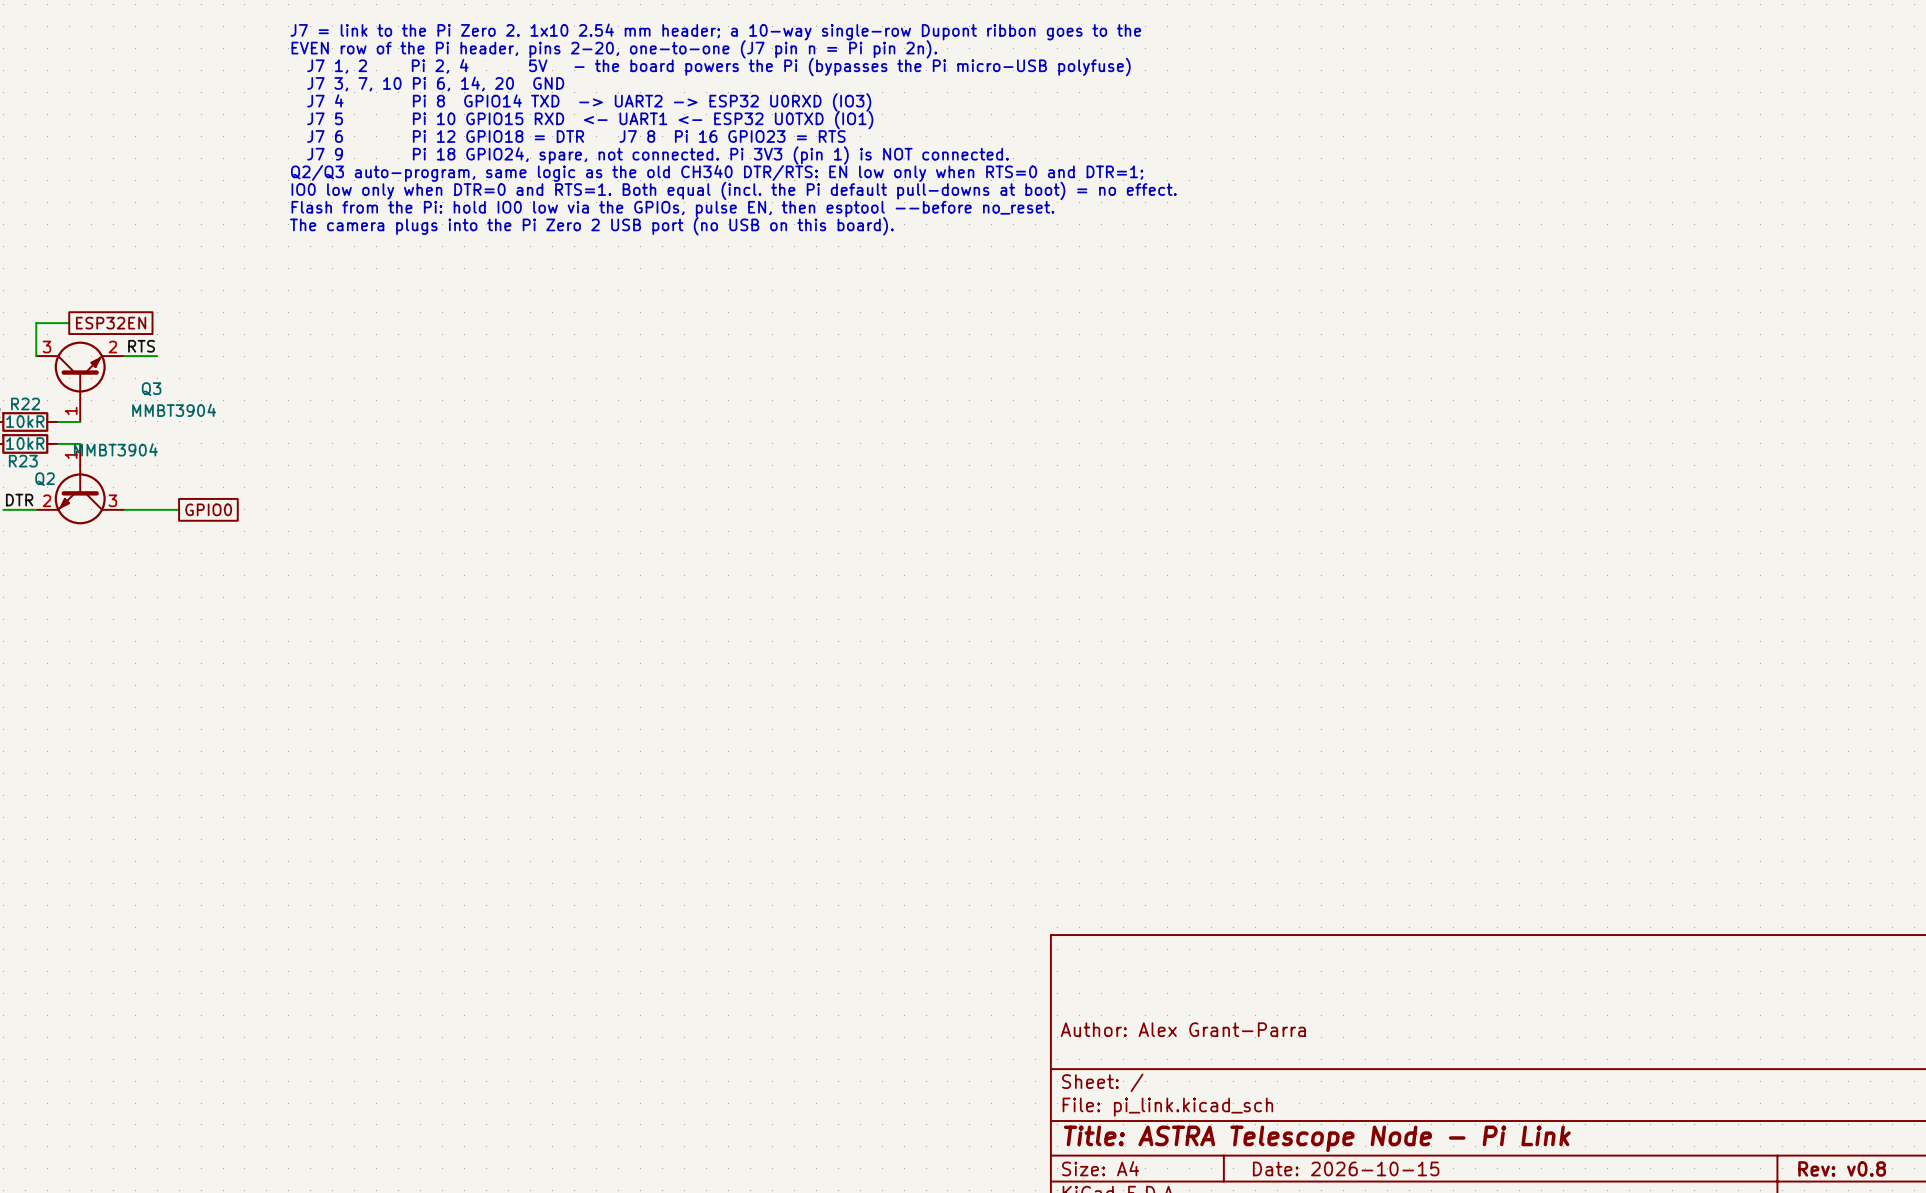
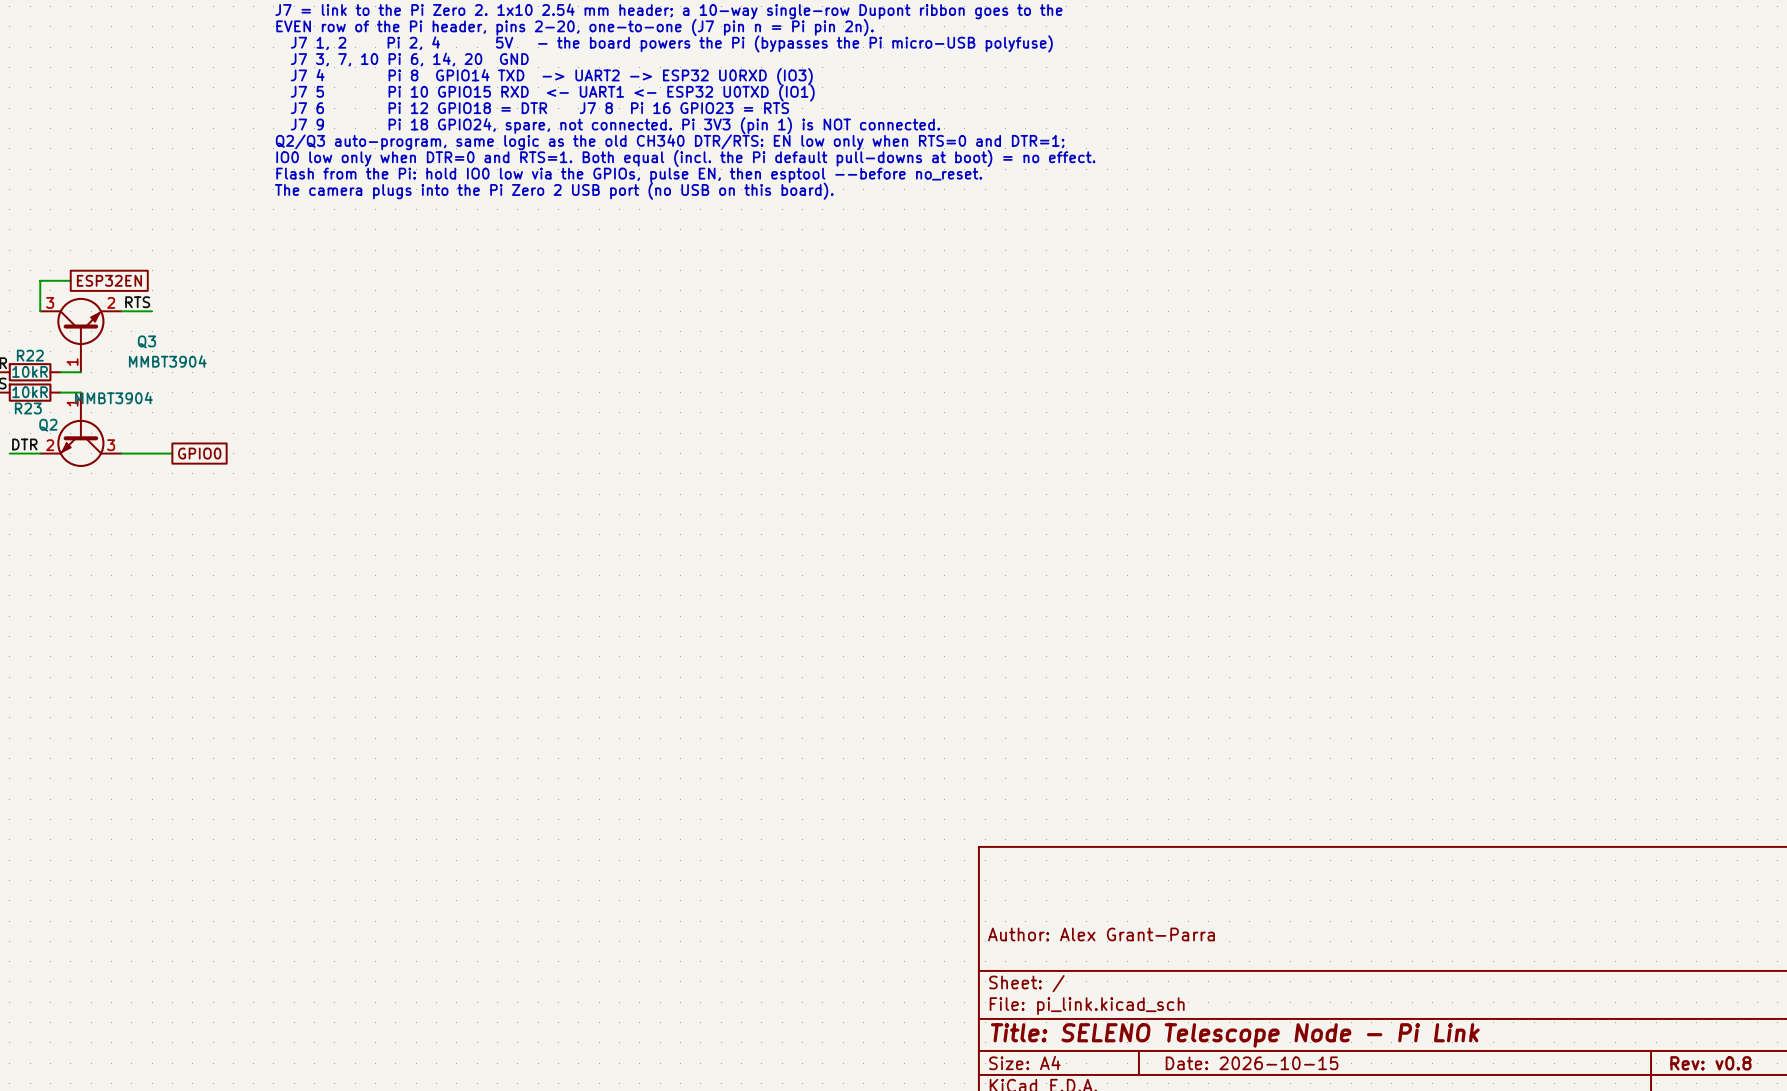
title block: Title: ASTRA Telescope Node - Pi Link (1317, 1138) -> Title: SELENO Telescope Node - Pi Link (1235, 1035)

